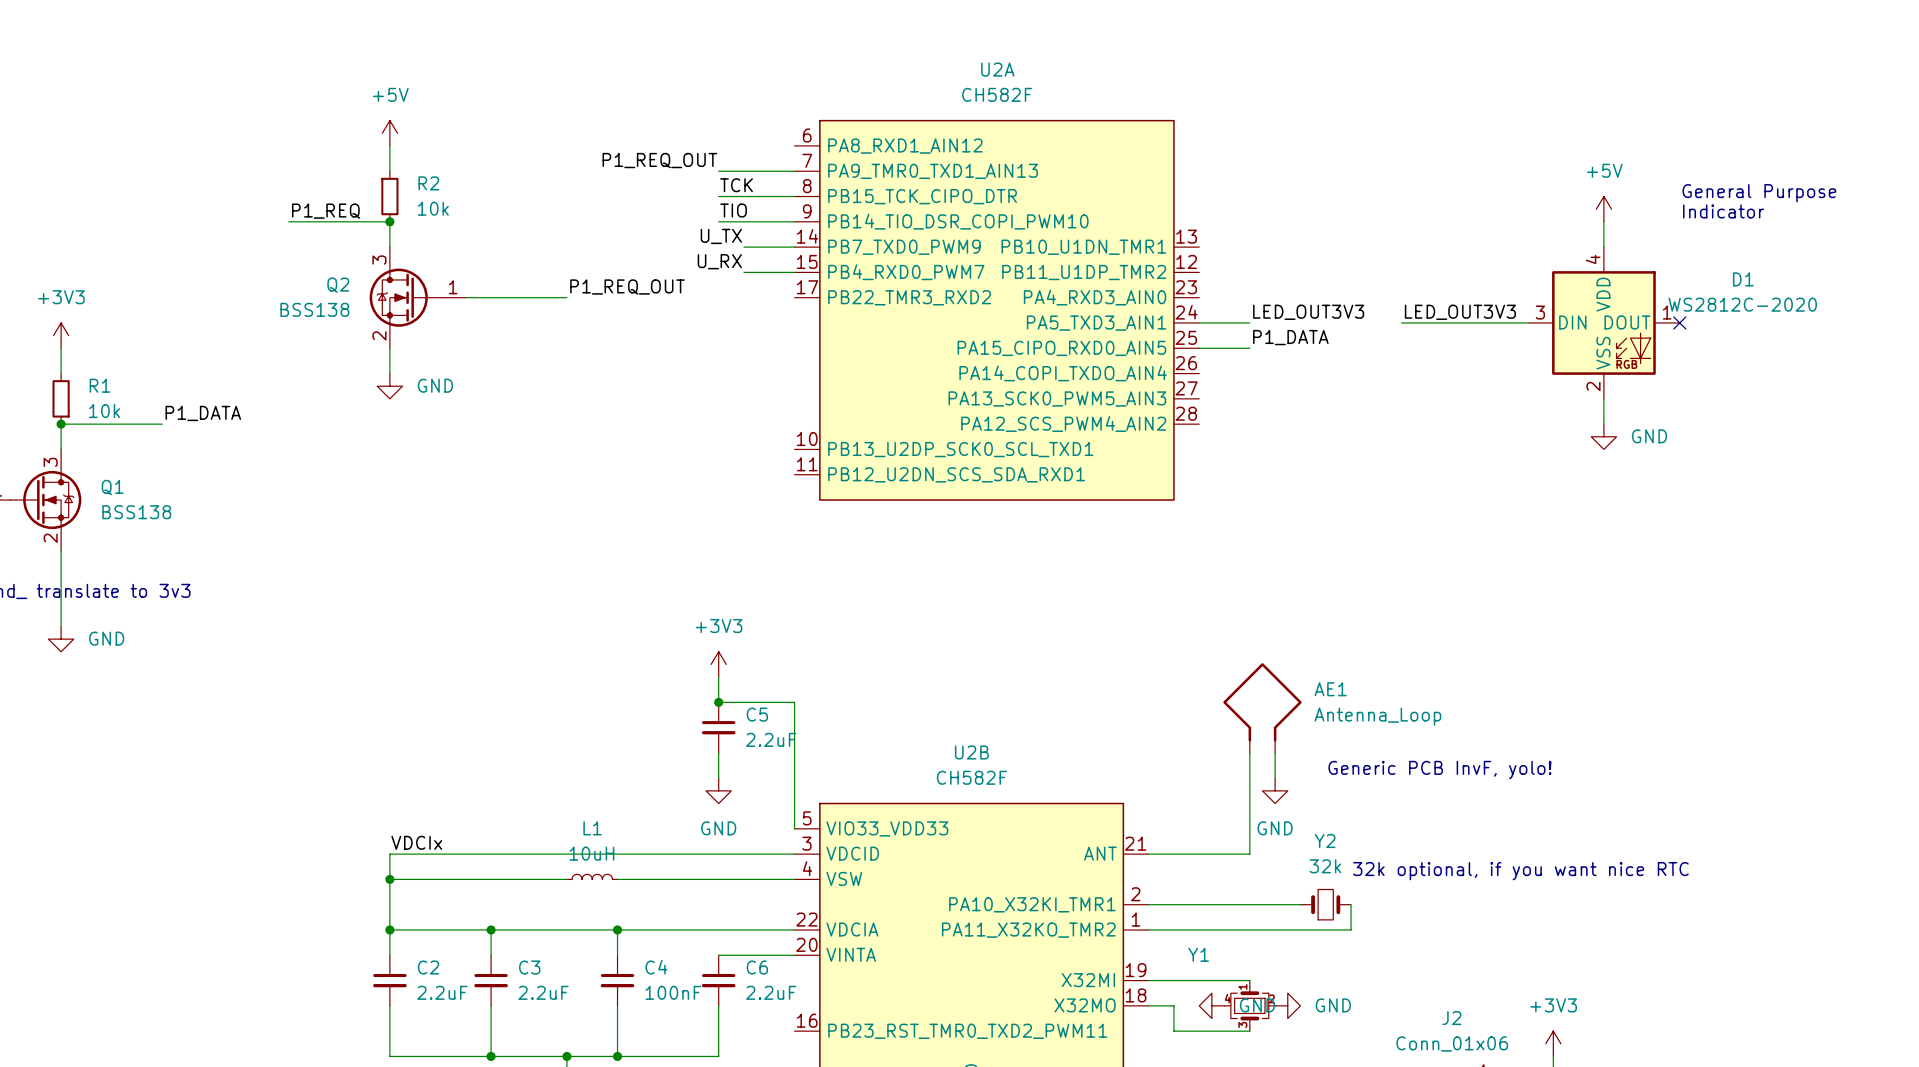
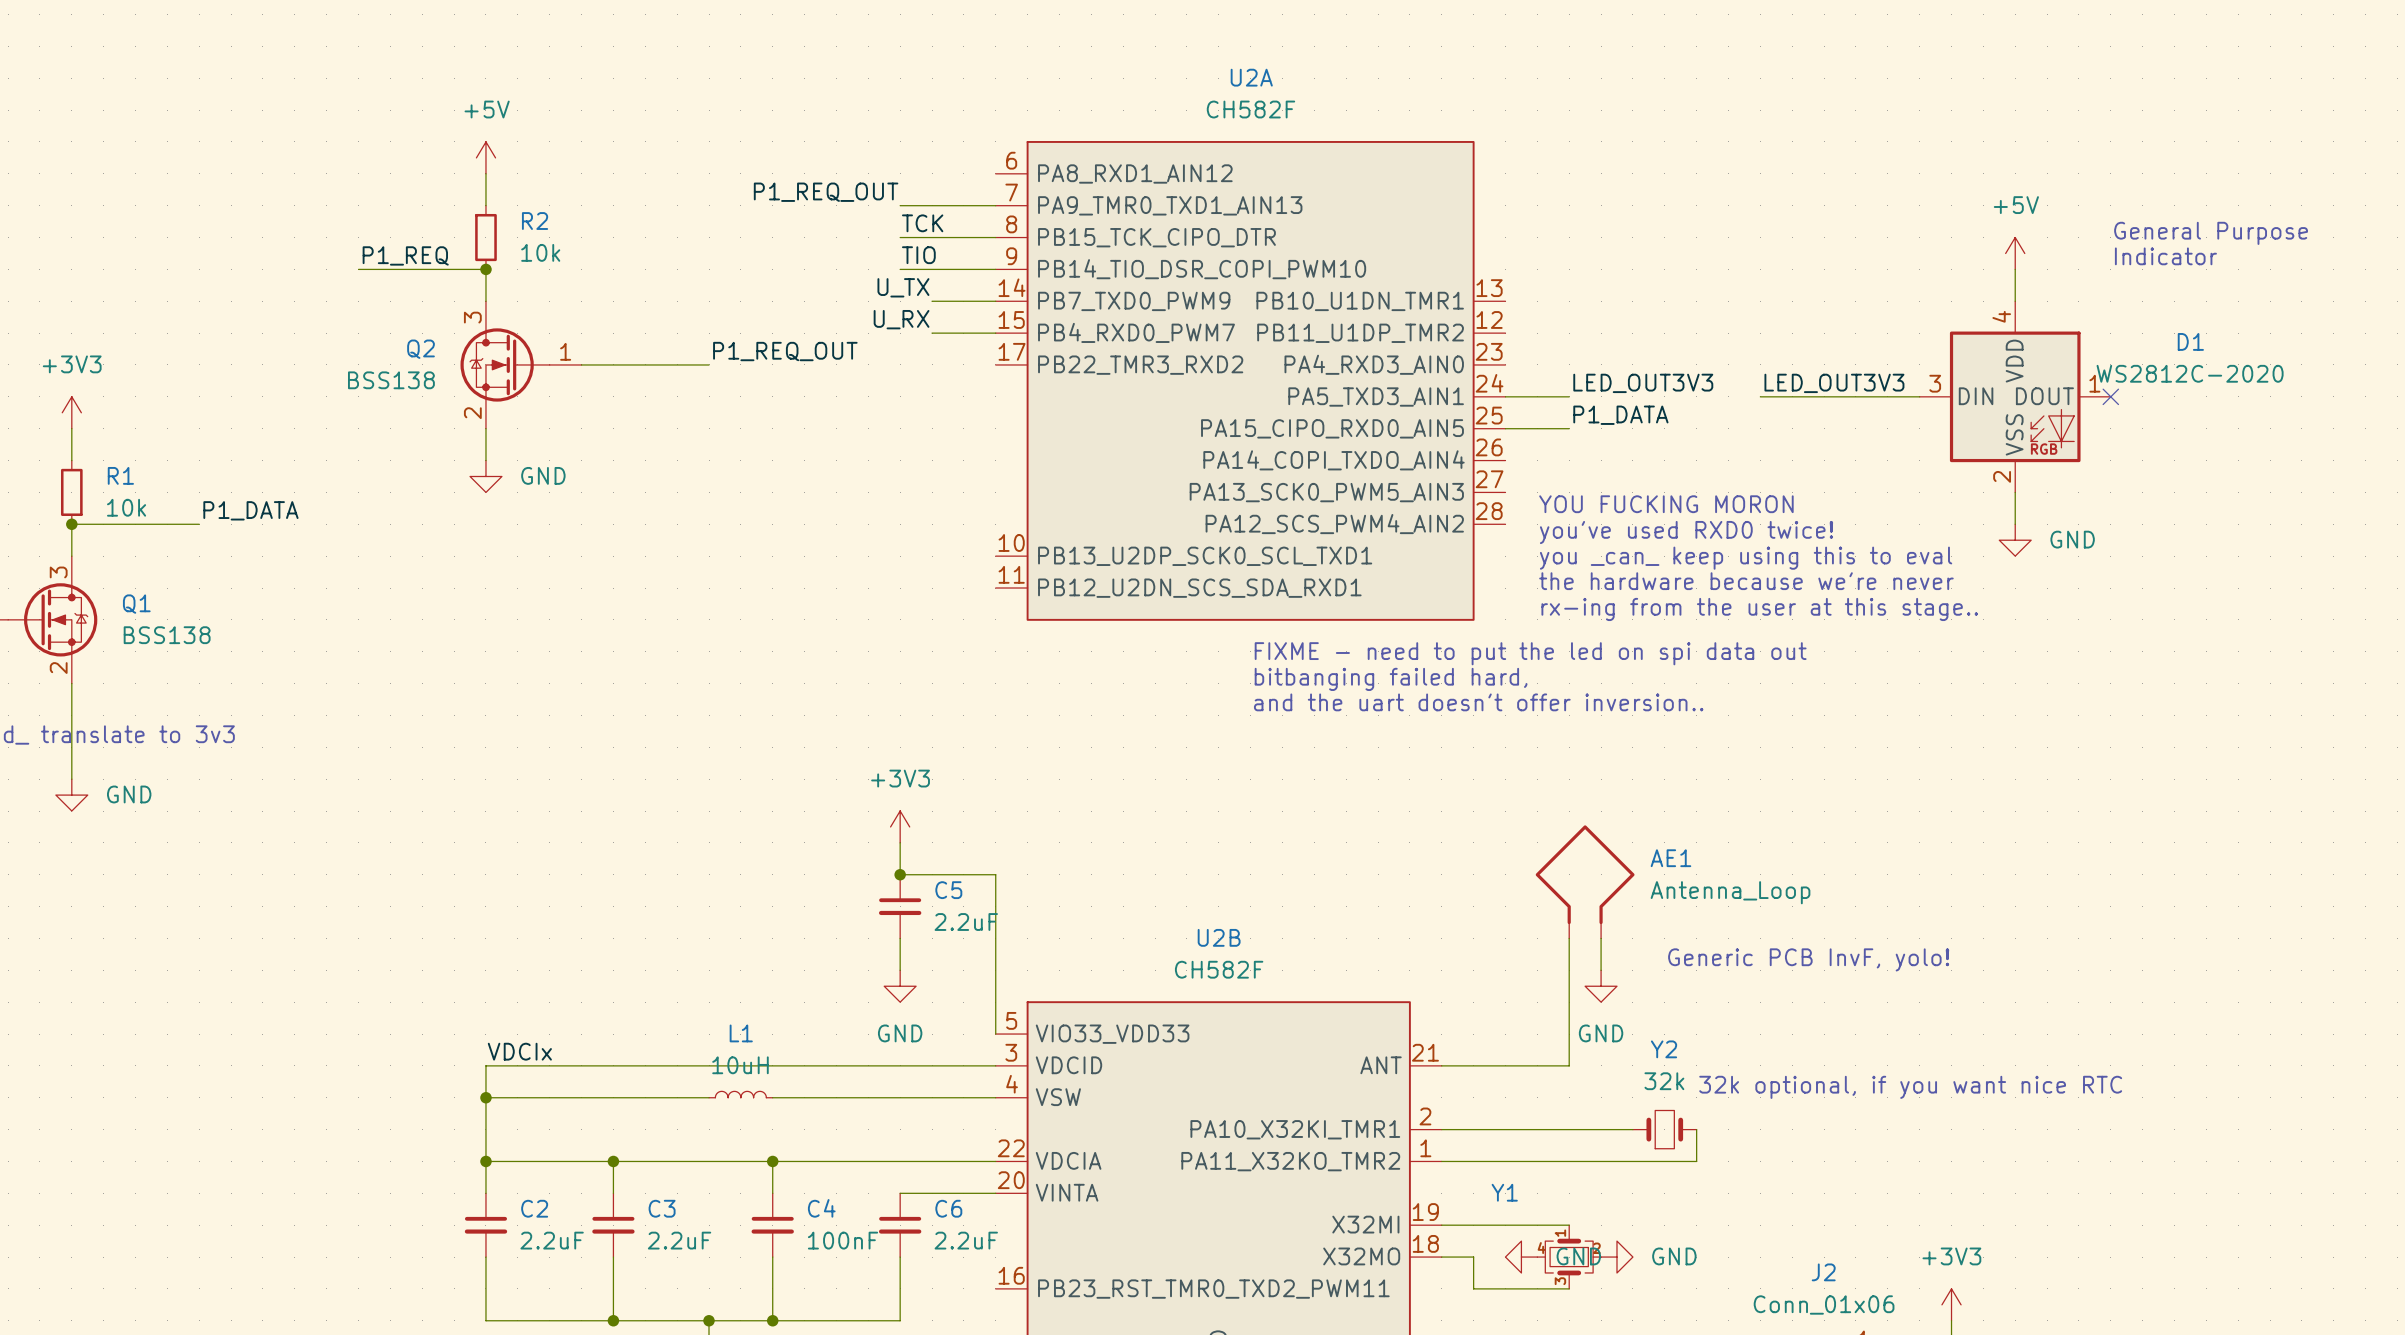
text: none -> YOU FUCKING MORON (1666, 504)
text: none -> you've used RXD0 twice! (1686, 532)
text: none -> you _can_ keep using this to eval (1746, 558)
text: none -> the hardware because we're never (1746, 581)
text: none -> rx-ing from the user at this stage.. (1759, 609)
text: none -> FIXME - need to put the led on spi data out (1530, 653)
text: none -> bitbanging failed hard, (1391, 679)
text: none -> and the uart doesn't offer inversion.. (1478, 702)

